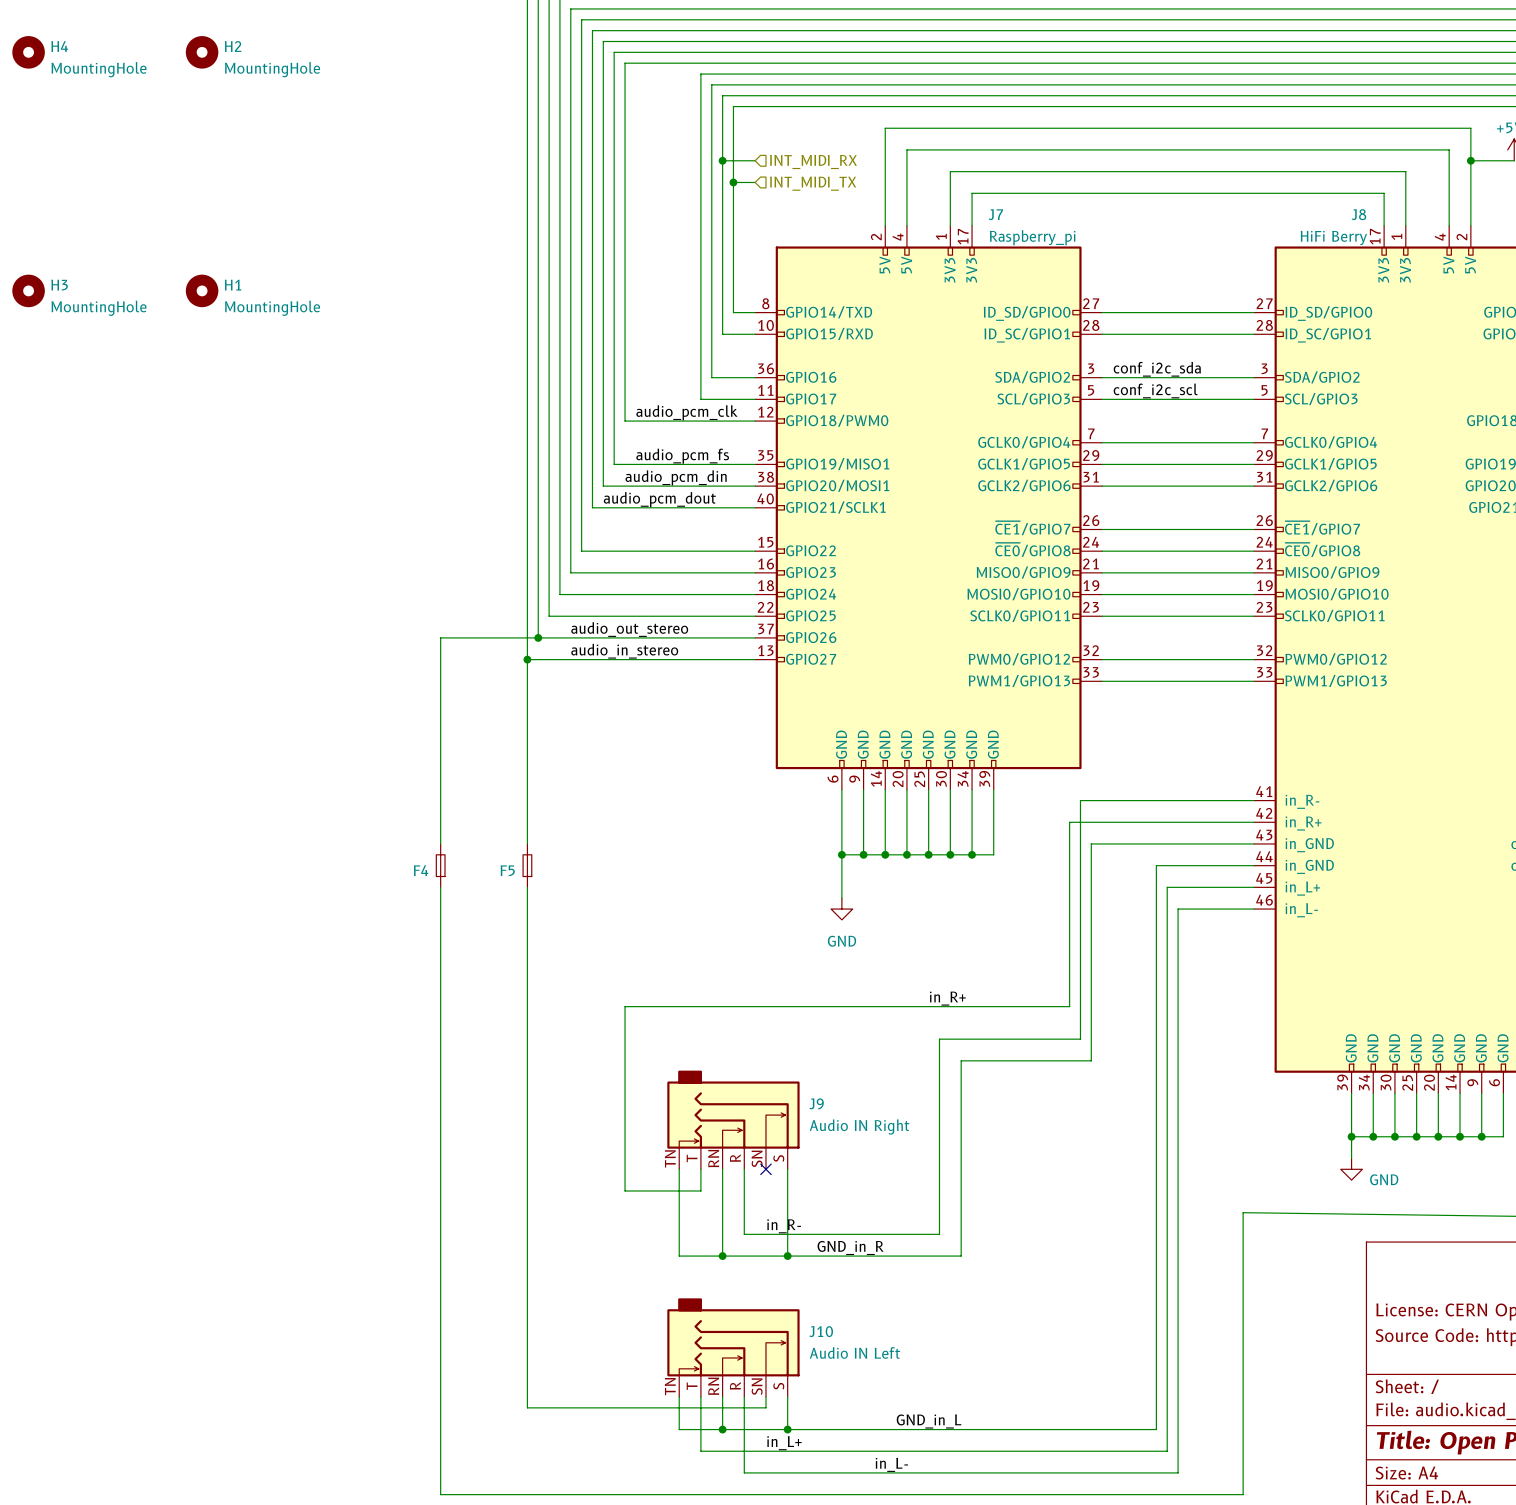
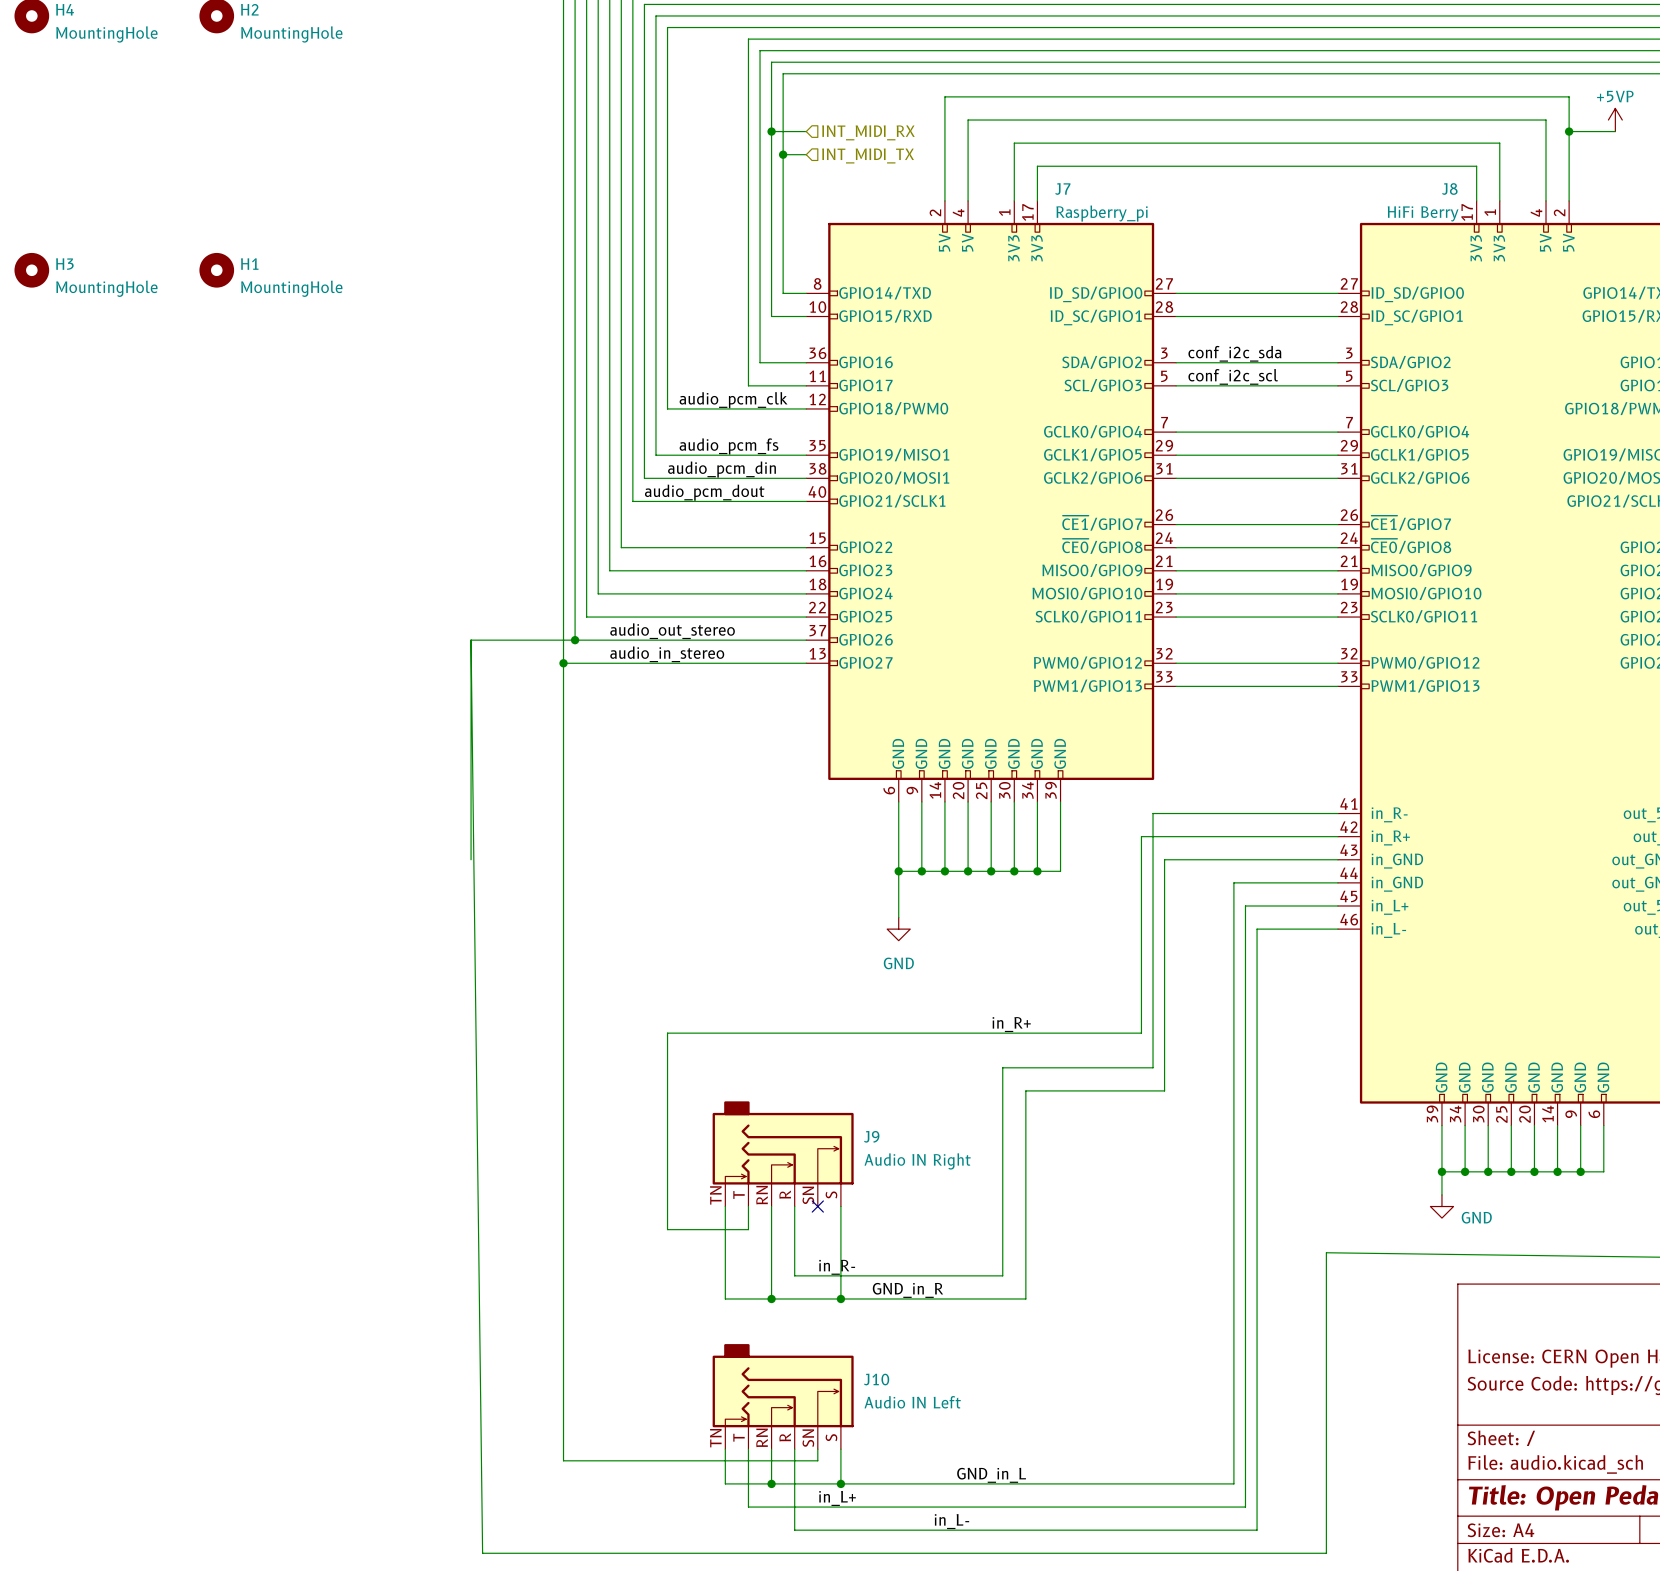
F4: (440, 865) -> none
F5: (527, 865) -> none
wire: (440, 887) (440, 1494) (451, 1494) -> (471, 640) (482, 1553)

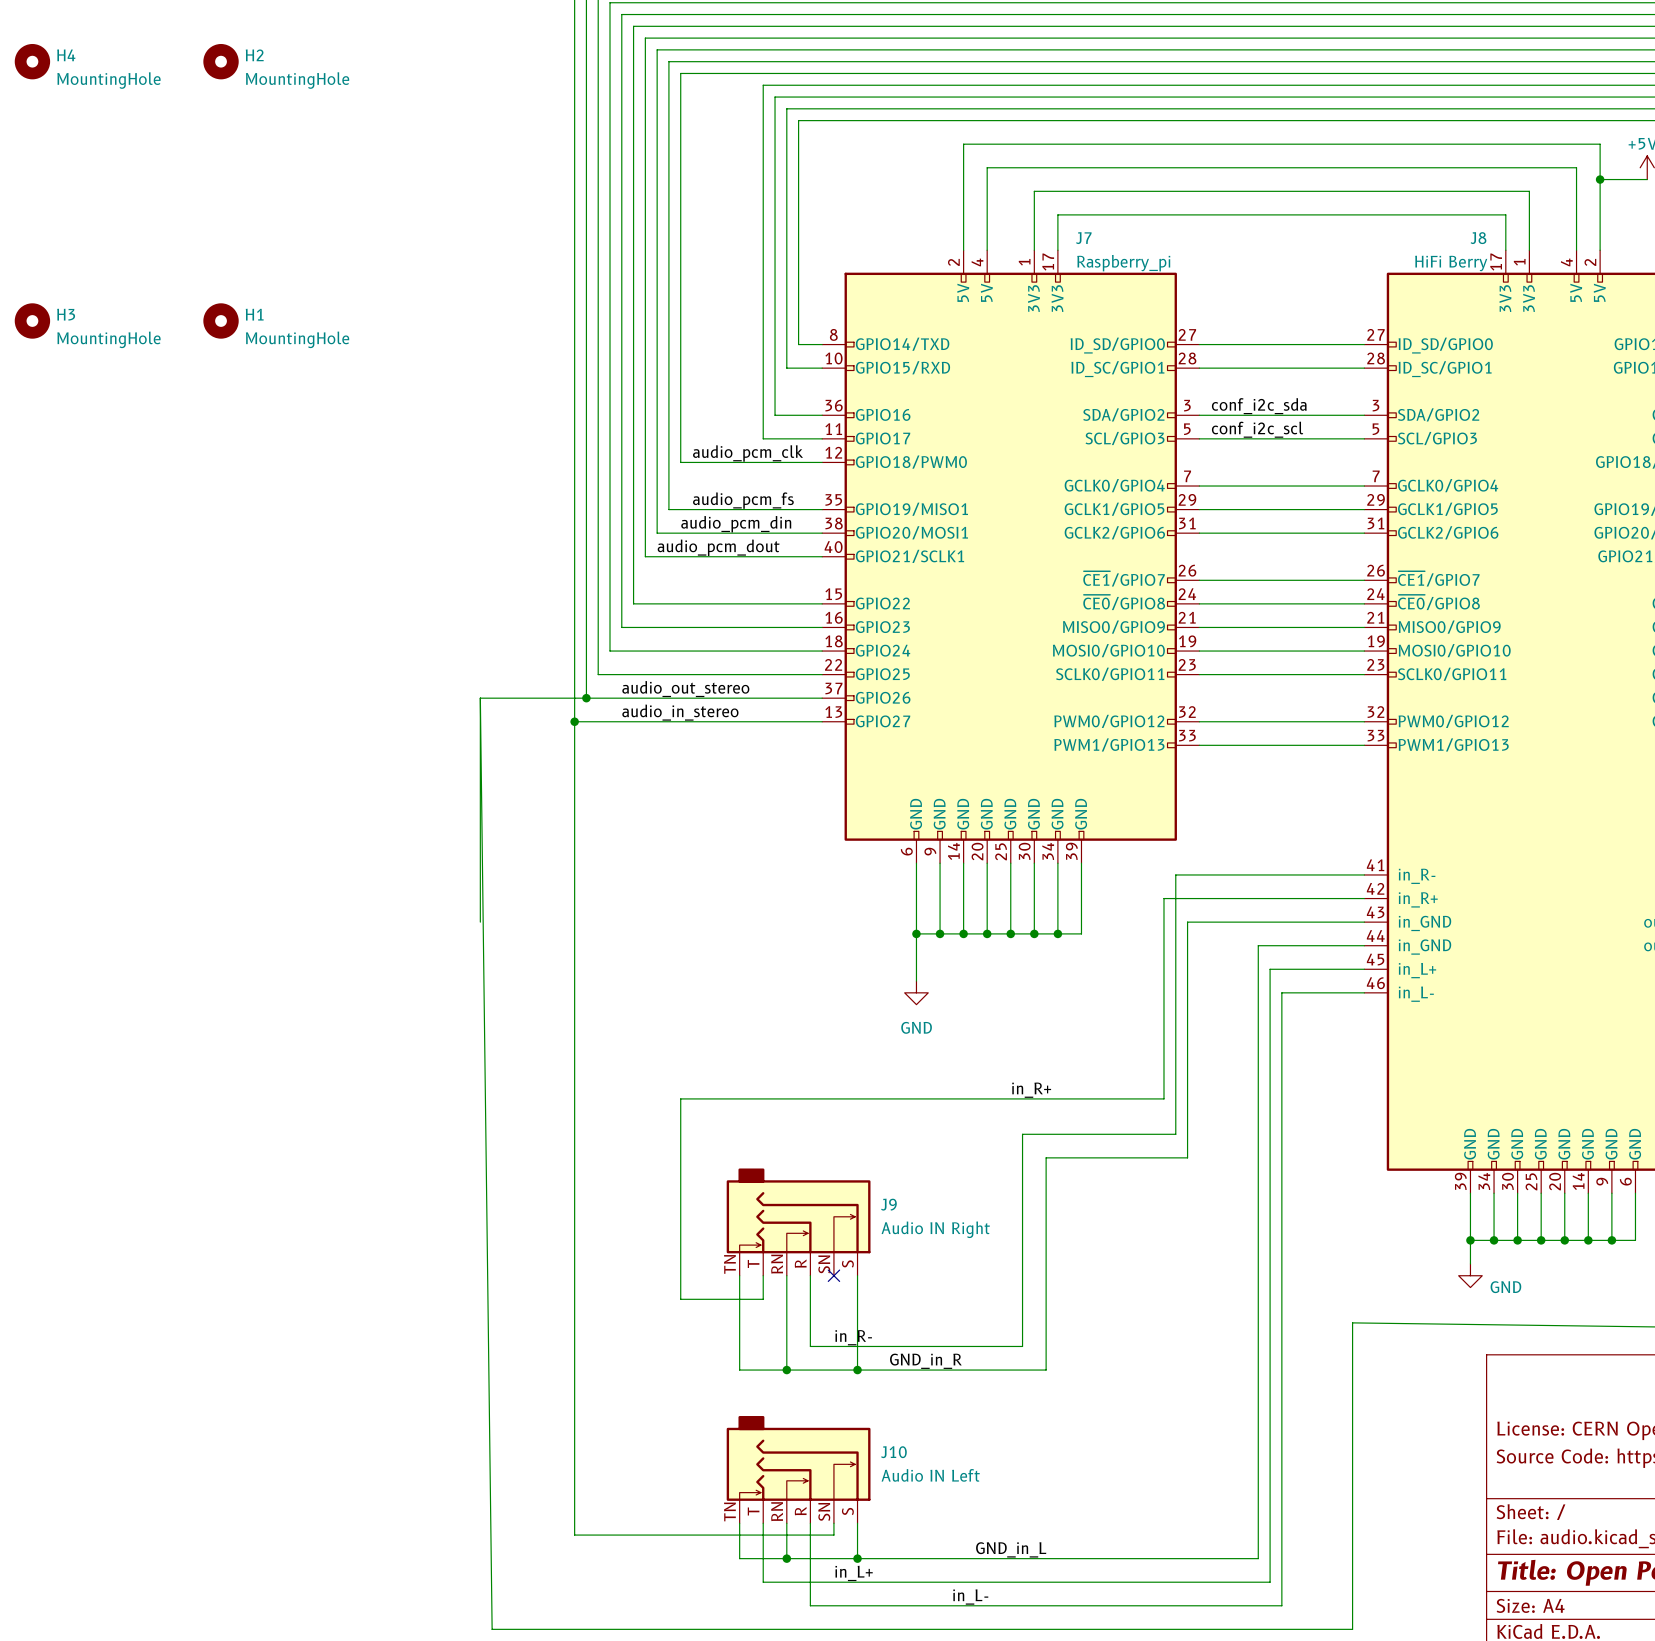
wire: (771, 131) (806, 131) -> none
junction: (771, 131) -> none
hierarchical label: INT_MIDI_RX (868, 132) -> none
wire: (783, 154) (806, 154) -> none
junction: (783, 154) -> none
hierarchical label: INT_MIDI_TX (868, 155) -> none

